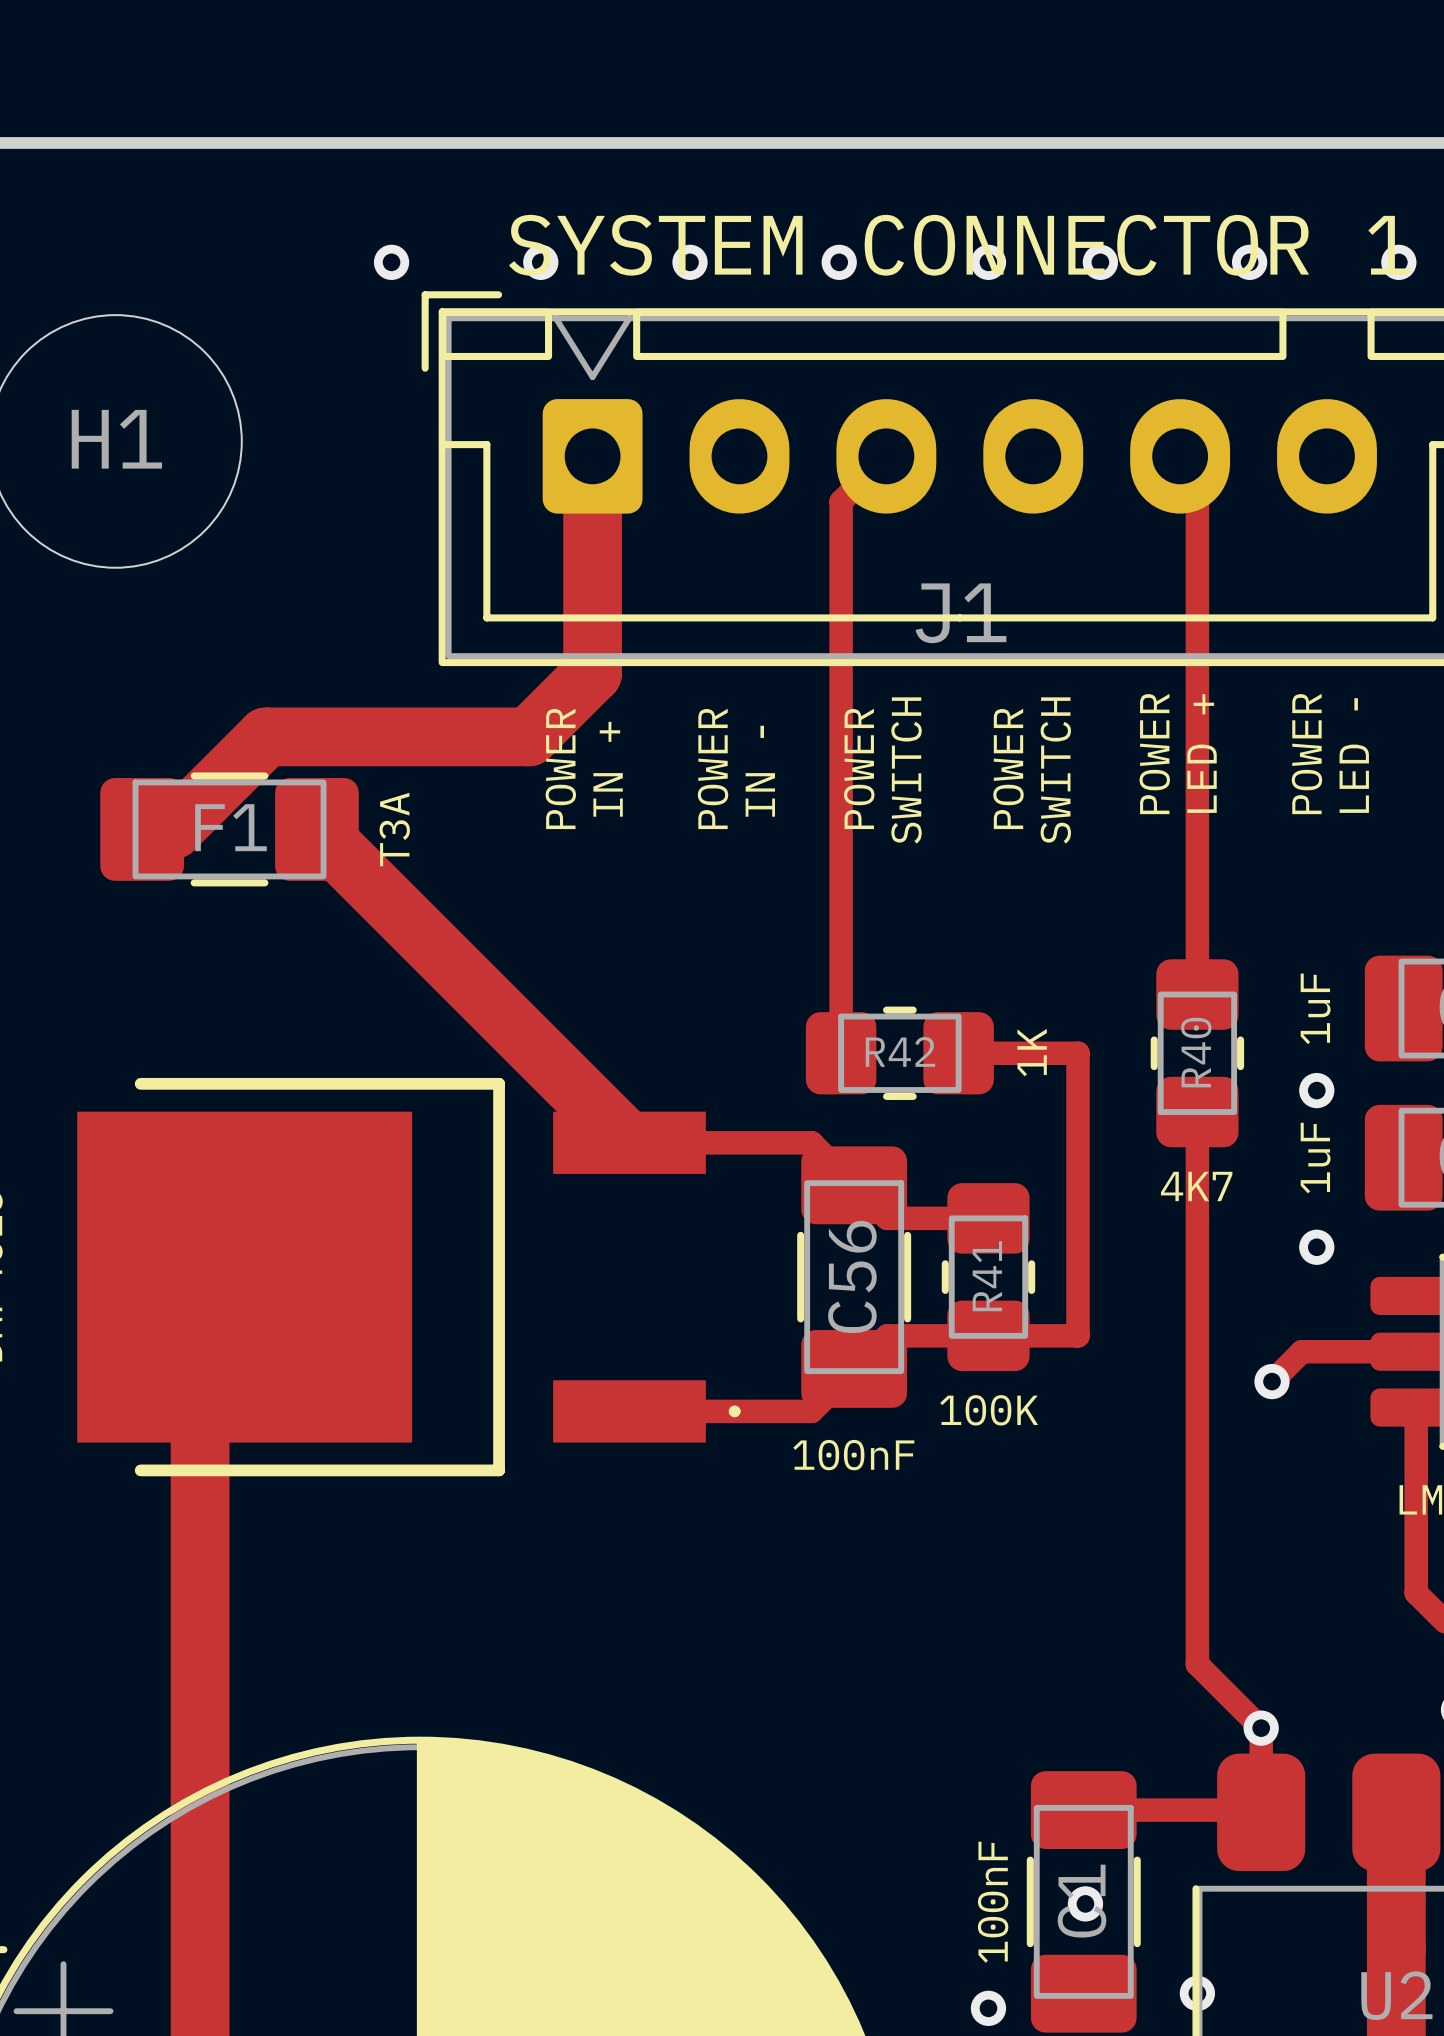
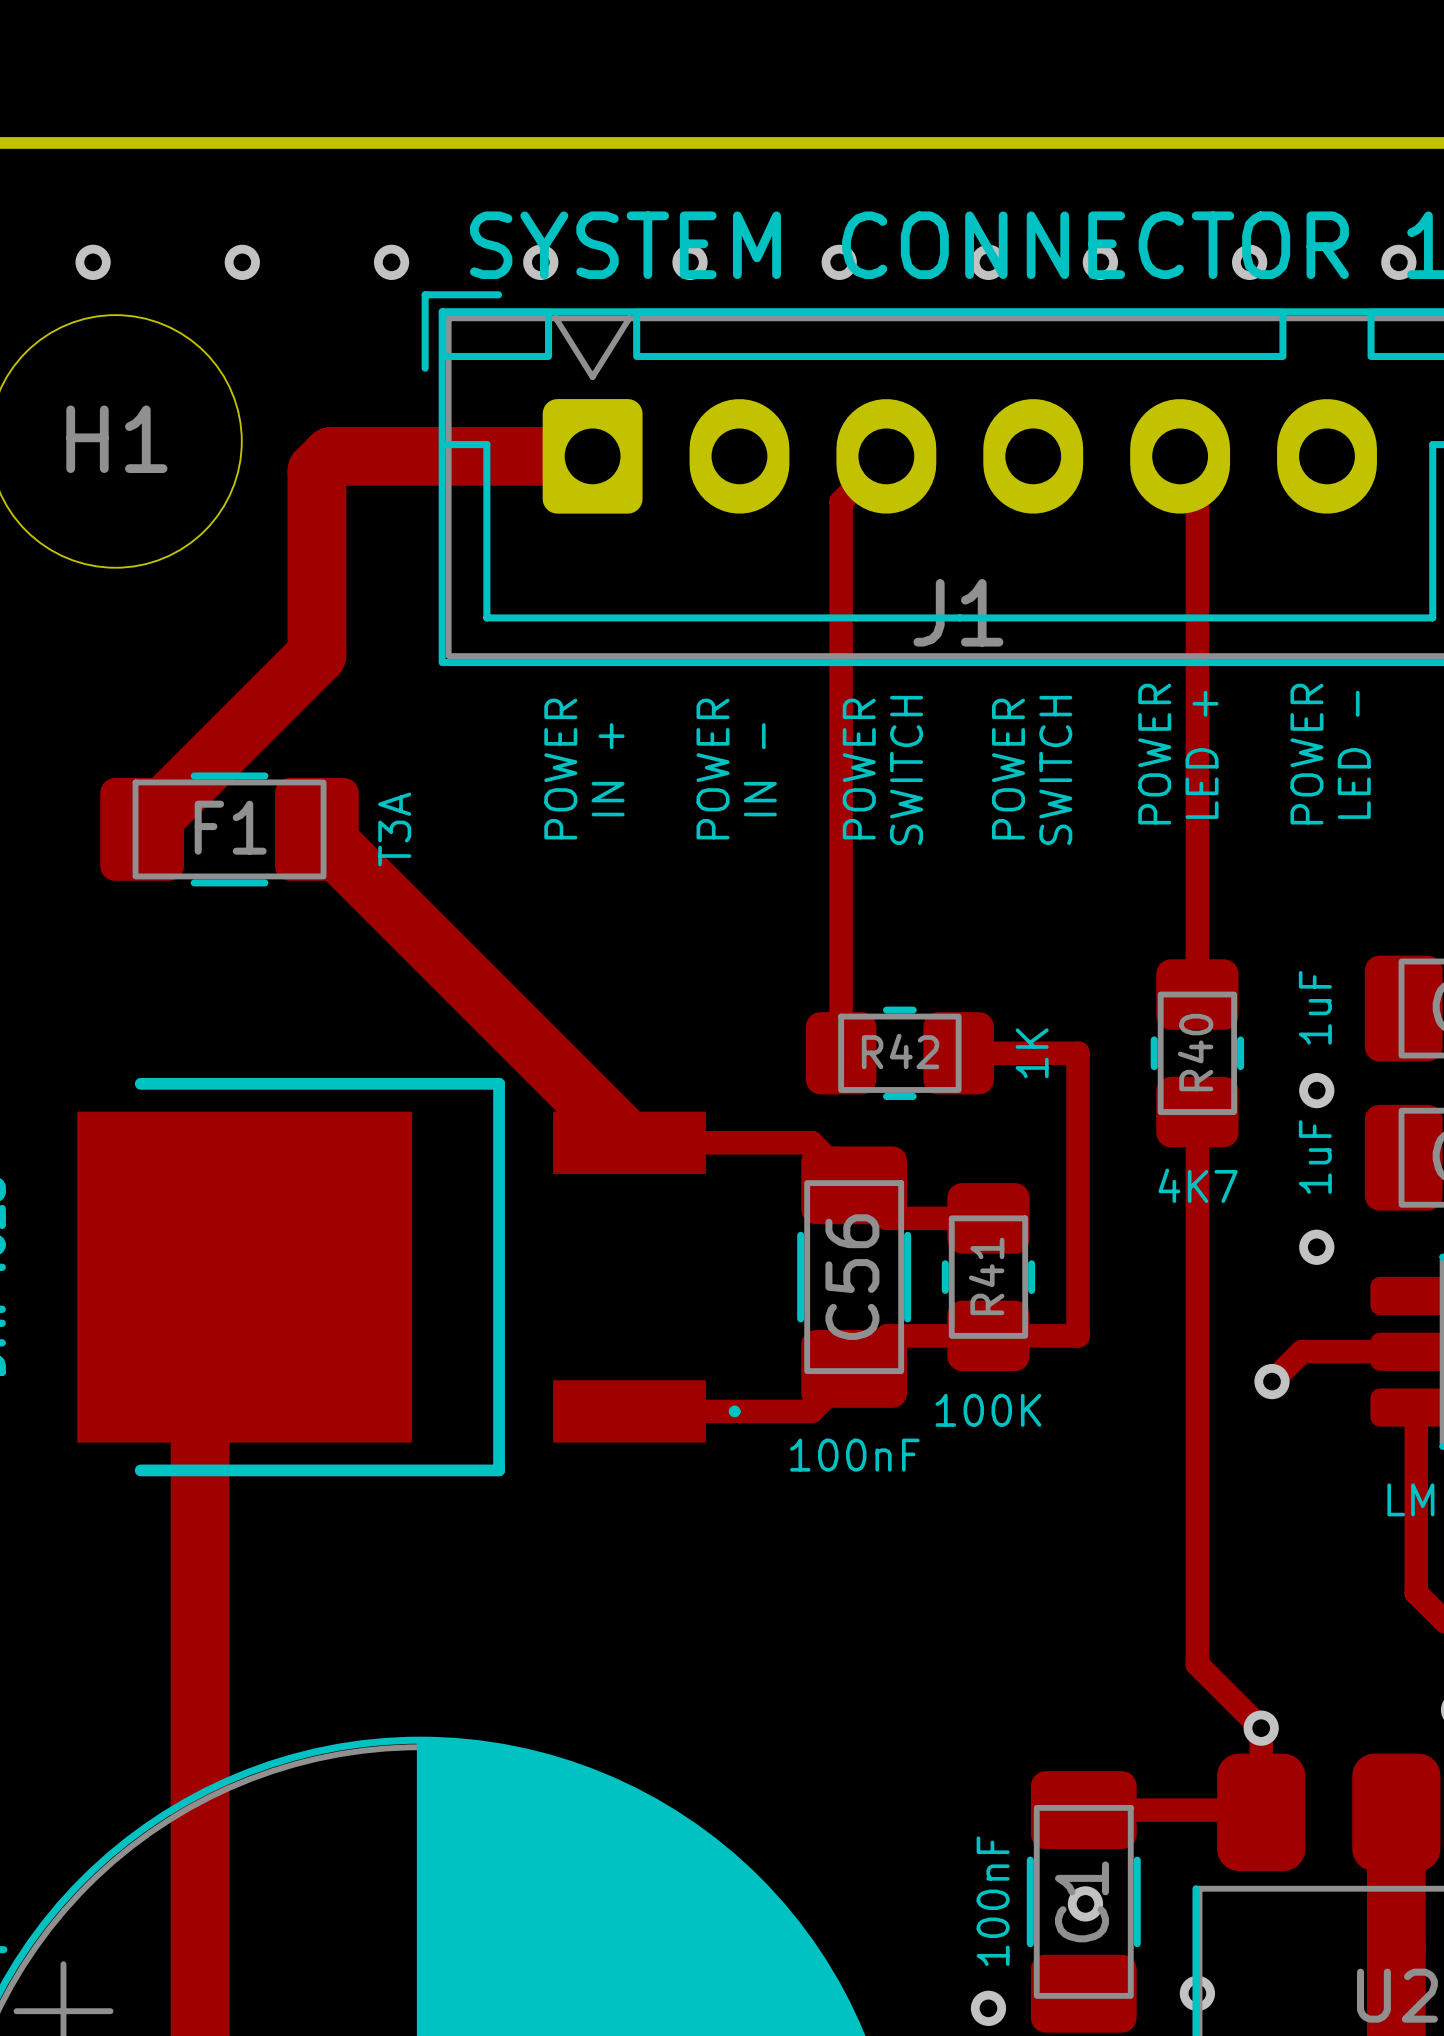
via: none -> (93, 262)
via: none -> (242, 262)
track: (592, 456) (592, 673) (528, 736) (266, 736) (173, 829) (142, 829) -> (592, 456) (331, 456) (316, 471) (316, 654) (142, 829)

